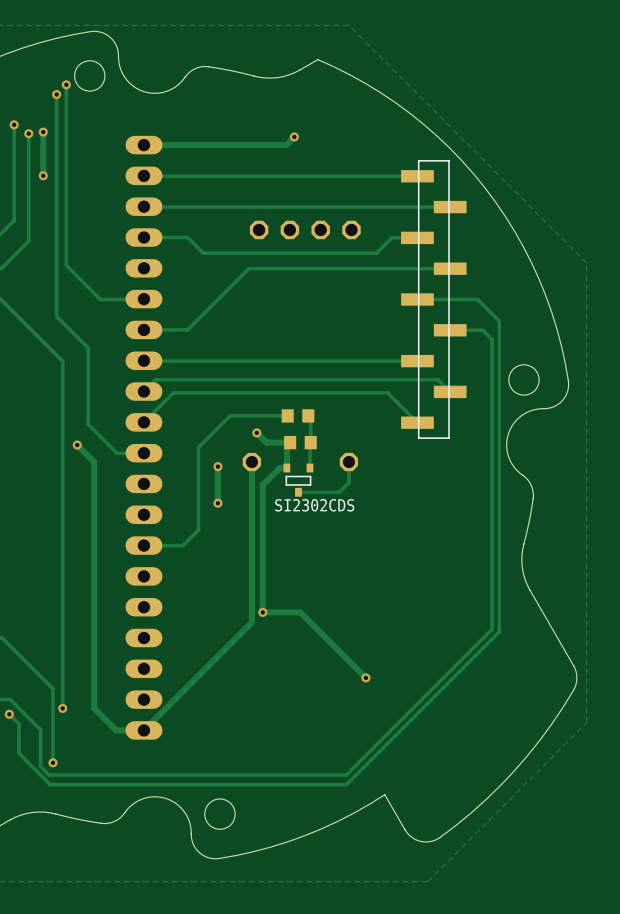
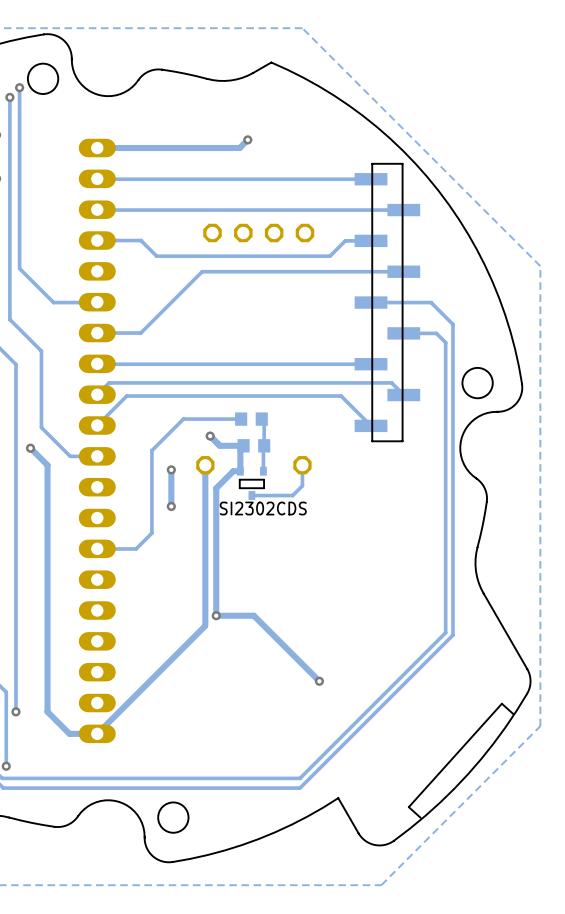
part: none -> (461, 760)

